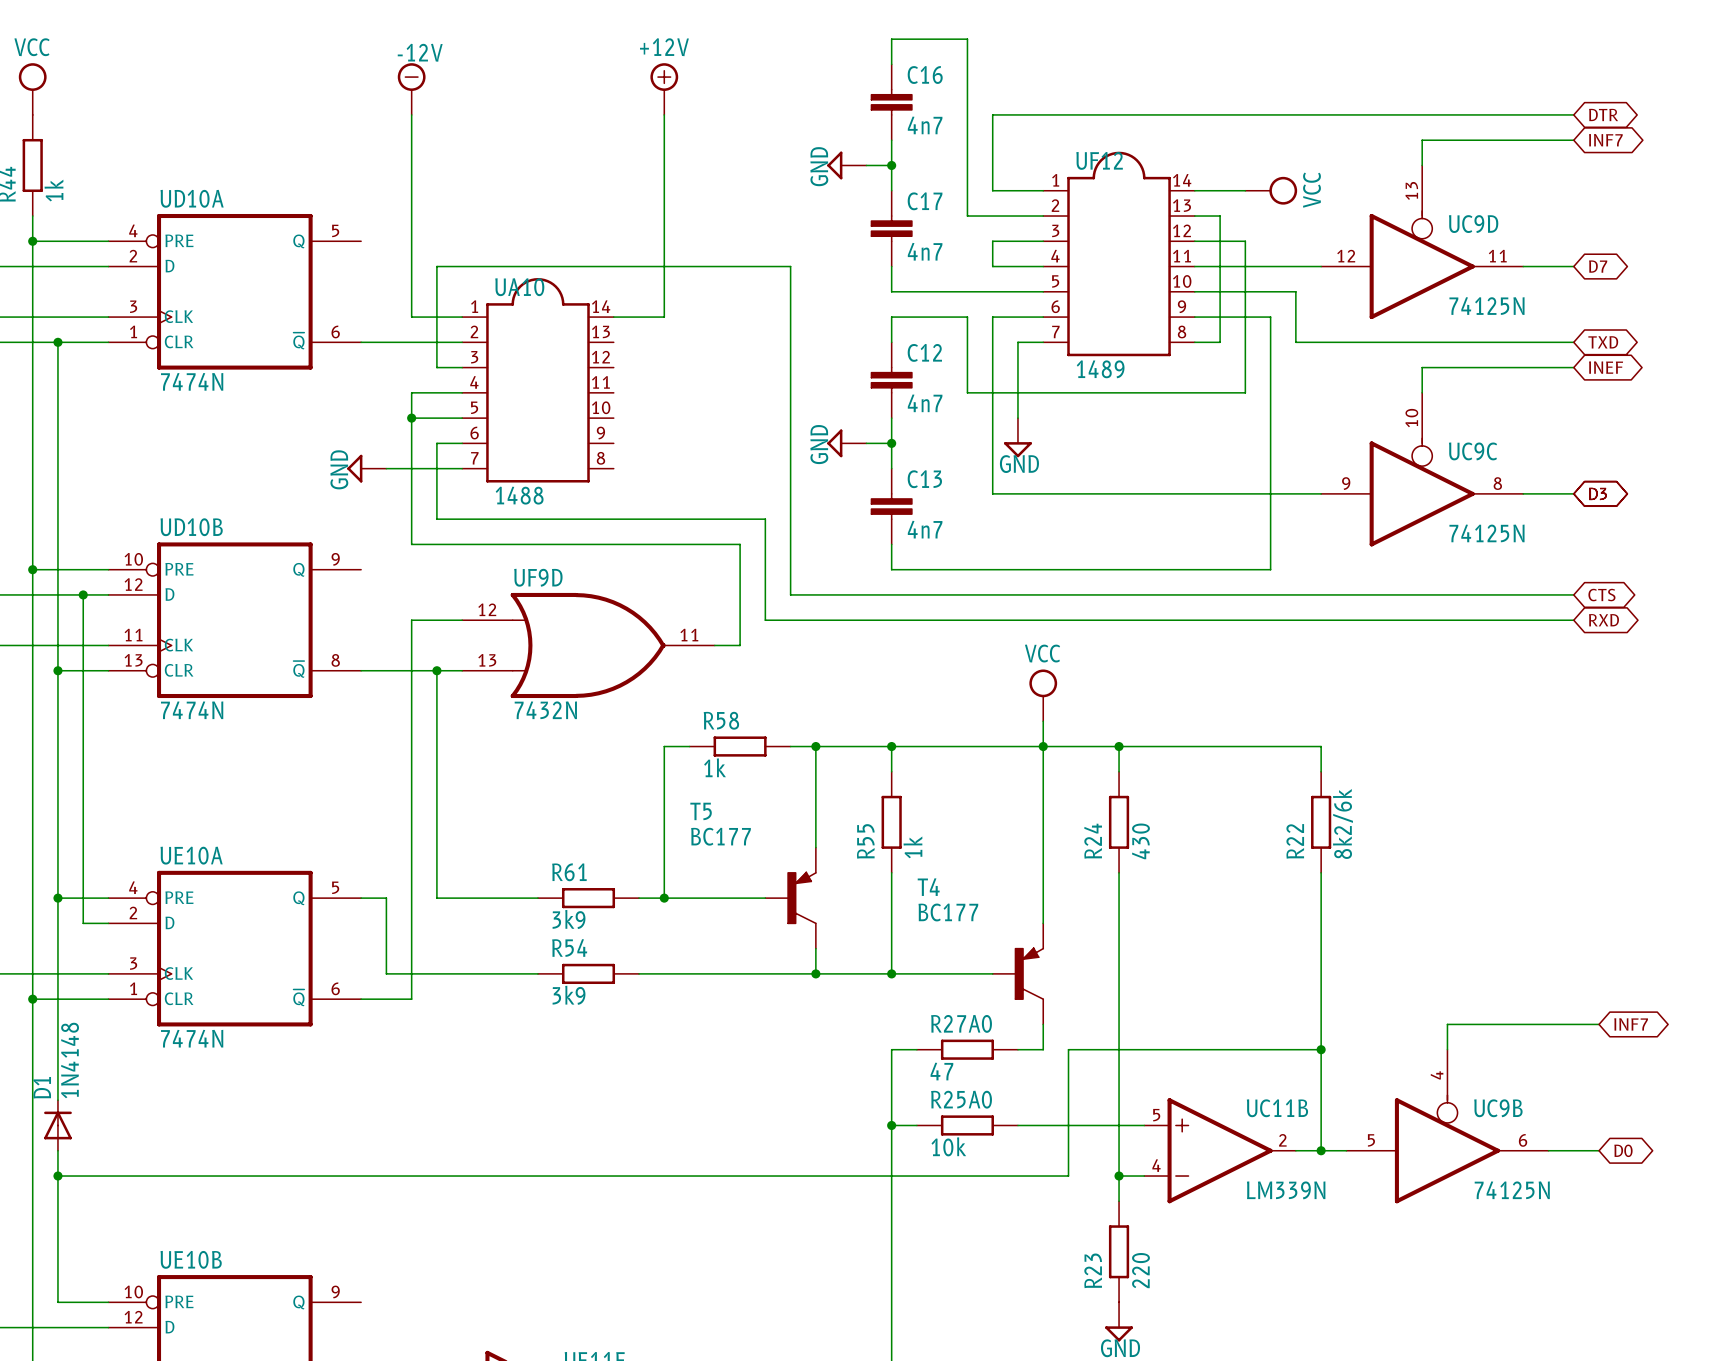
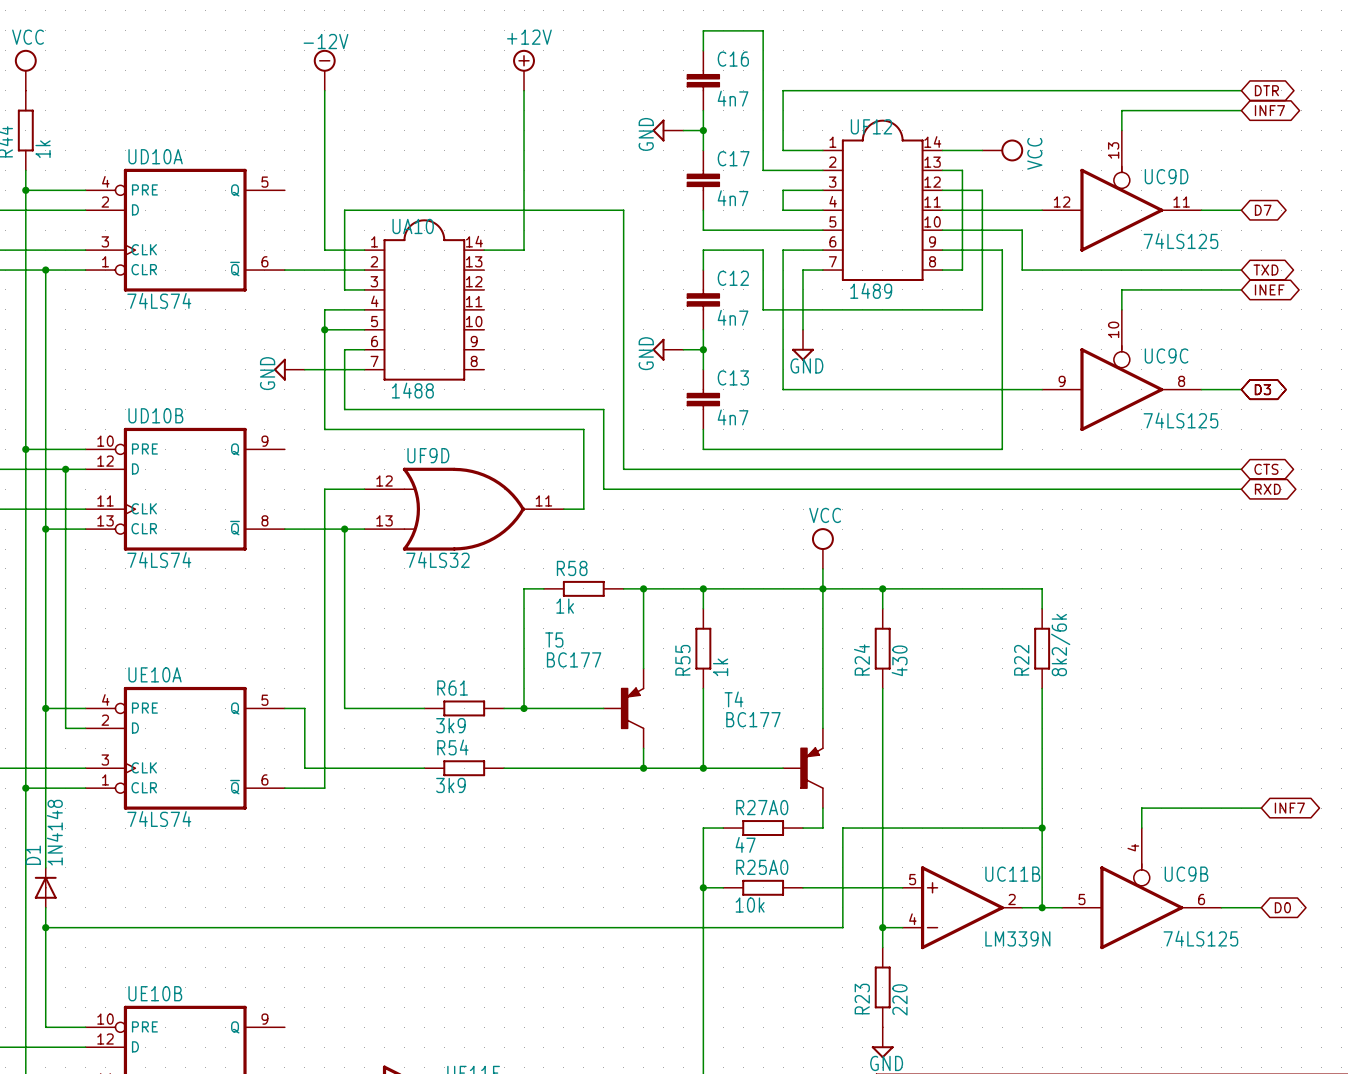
UC9D value: 74125N (1486, 306) -> 74LS125 (1180, 241)
UD10A value: 7474N (192, 381) -> 74LS74 (159, 300)
UC9C value: 74125N (1486, 533) -> 74LS125 (1180, 420)
UD10B value: 7474N (192, 710) -> 74LS74 (159, 559)
UF9D value: 7432N (545, 710) -> 74LS32 (437, 559)
UE10A value: 7474N (192, 1038) -> 74LS74 (159, 819)
UC9B value: 74125N (1512, 1190) -> 74LS125 (1200, 938)

